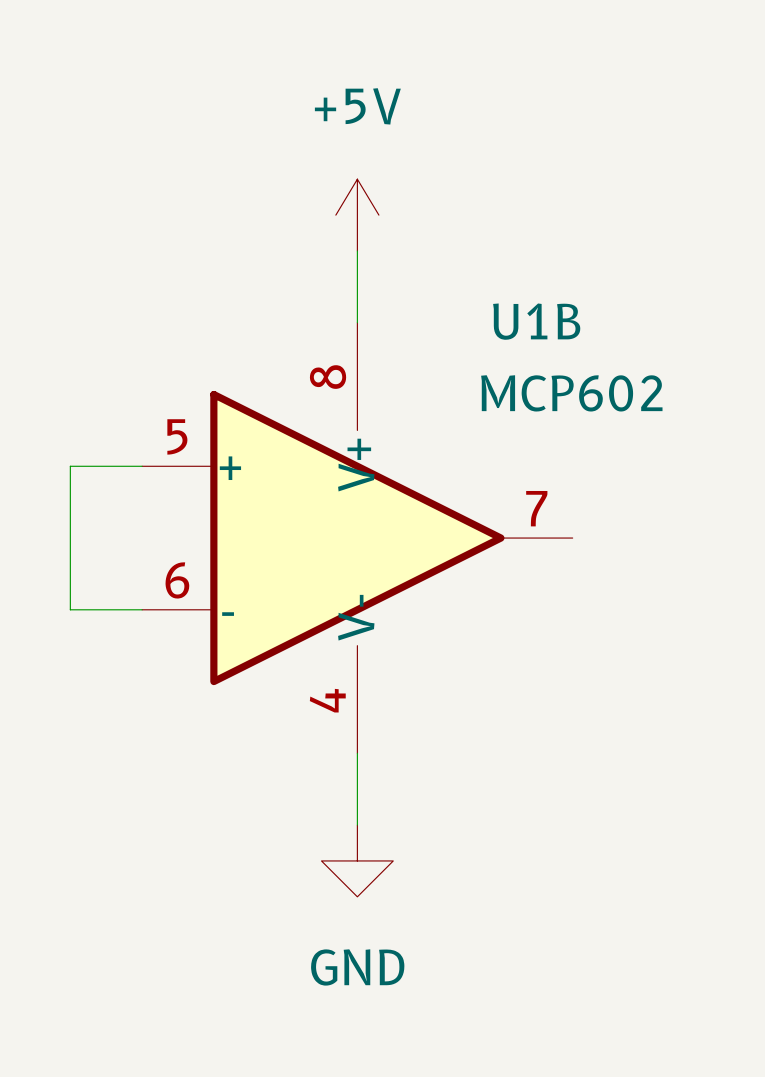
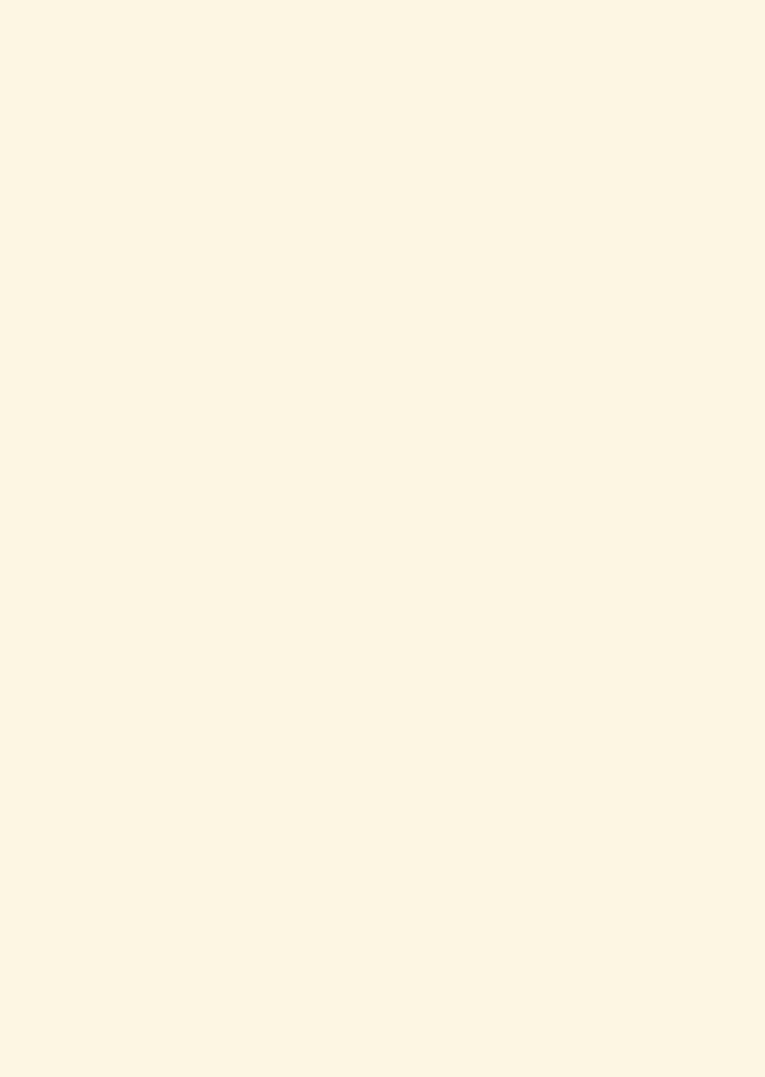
power symbol: +5V (357, 215) -> none
wire: (357, 251) (357, 322) -> none
wire: (142, 466) (70, 466) (70, 609) (142, 609) -> none
U1B: MCP602 (357, 538) -> none
part: (357, 538) -> none
wire: (357, 753) (357, 825) -> none
power symbol: GND (357, 860) -> none

